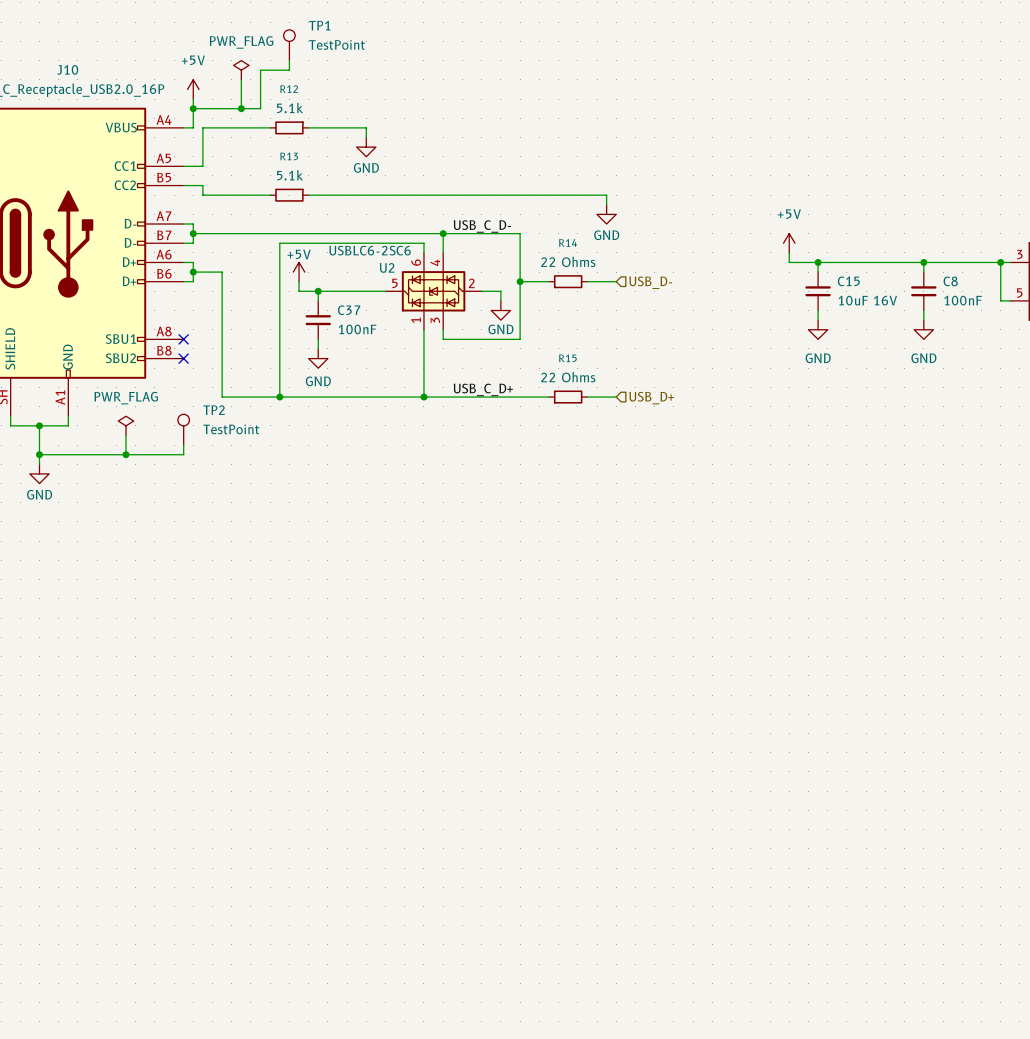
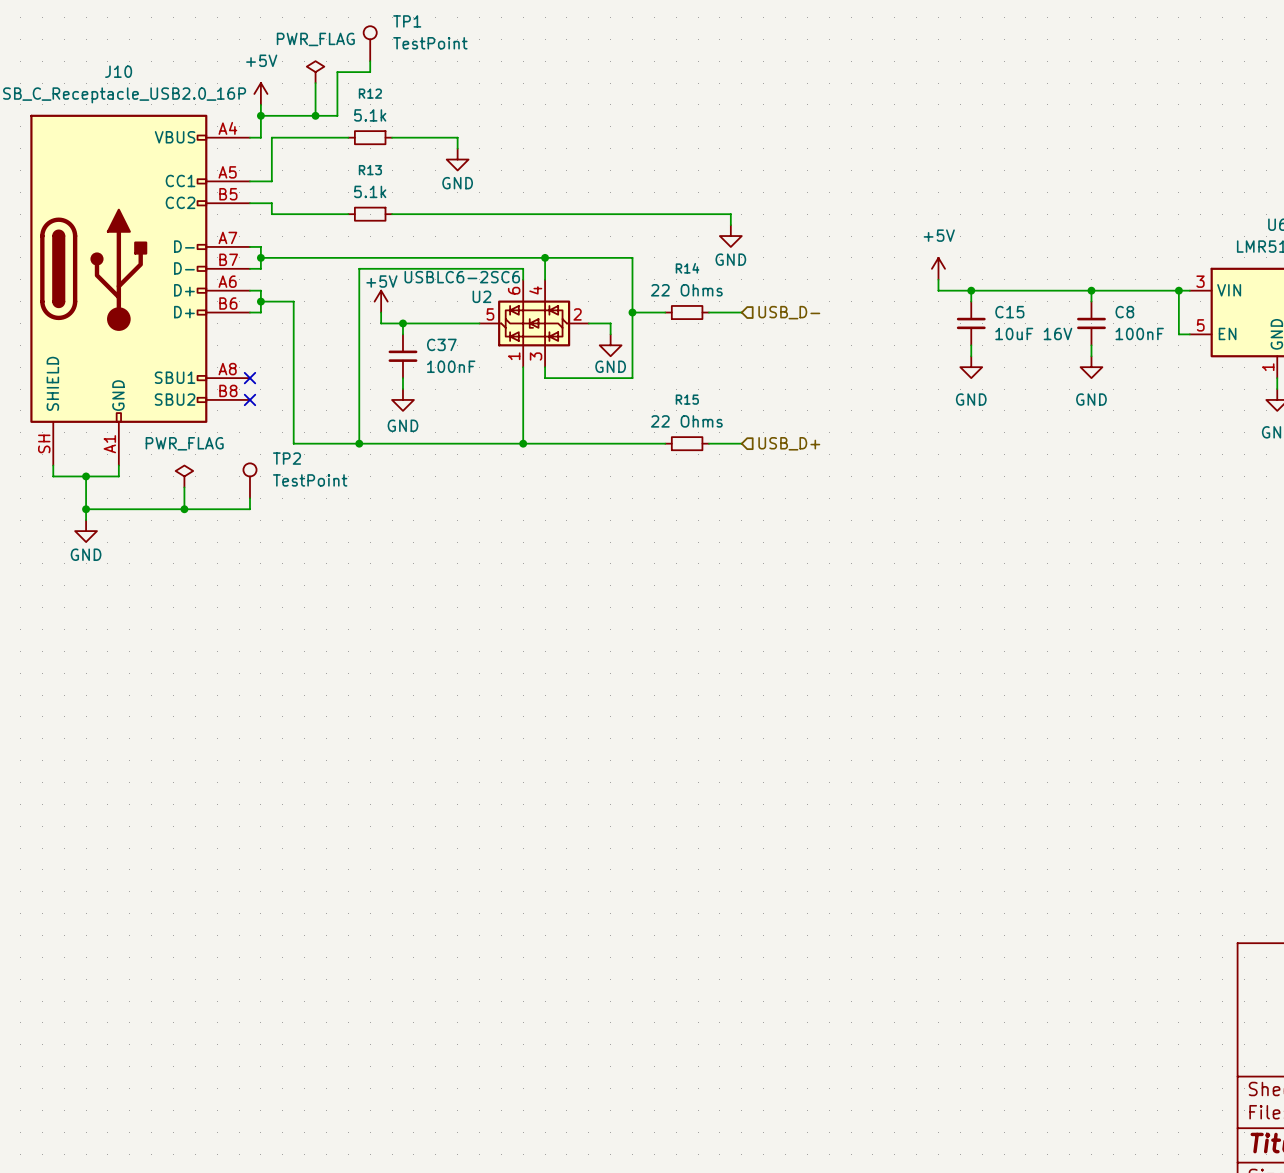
label: USB_C_D- (482, 226) -> none
label: USB_C_D+ (483, 389) -> none

